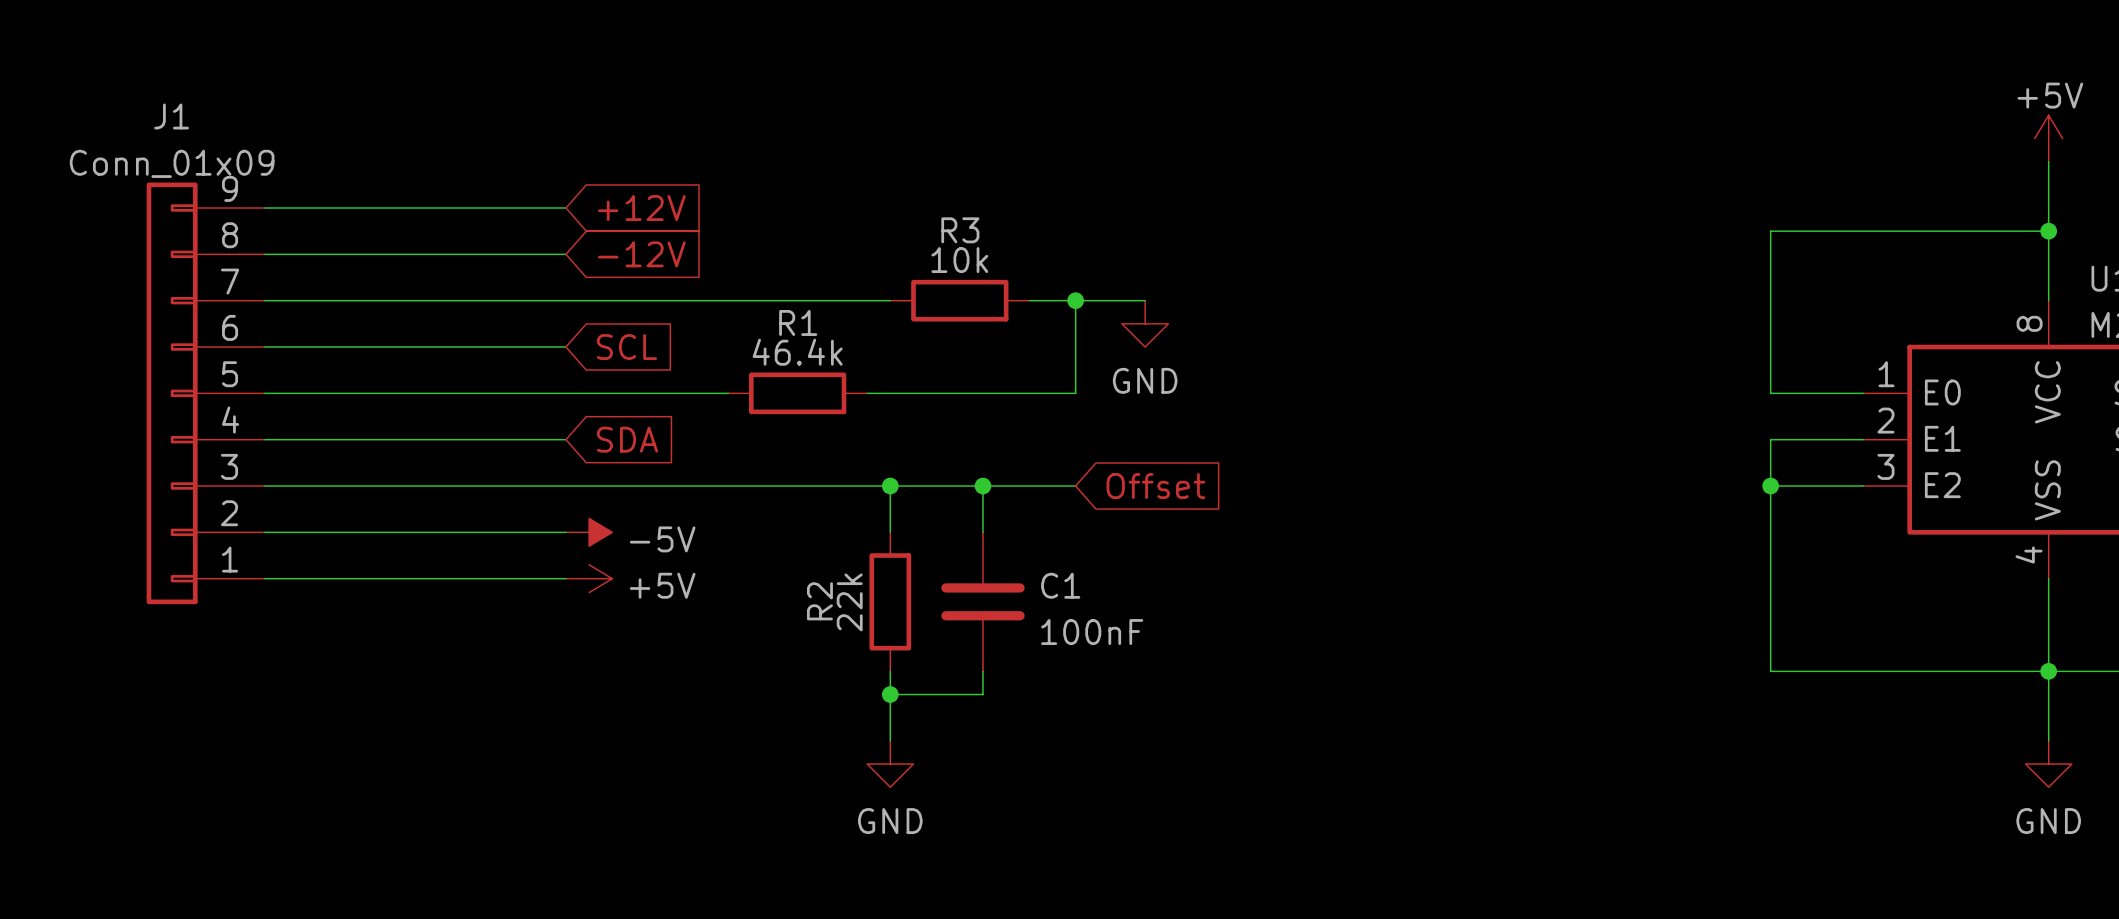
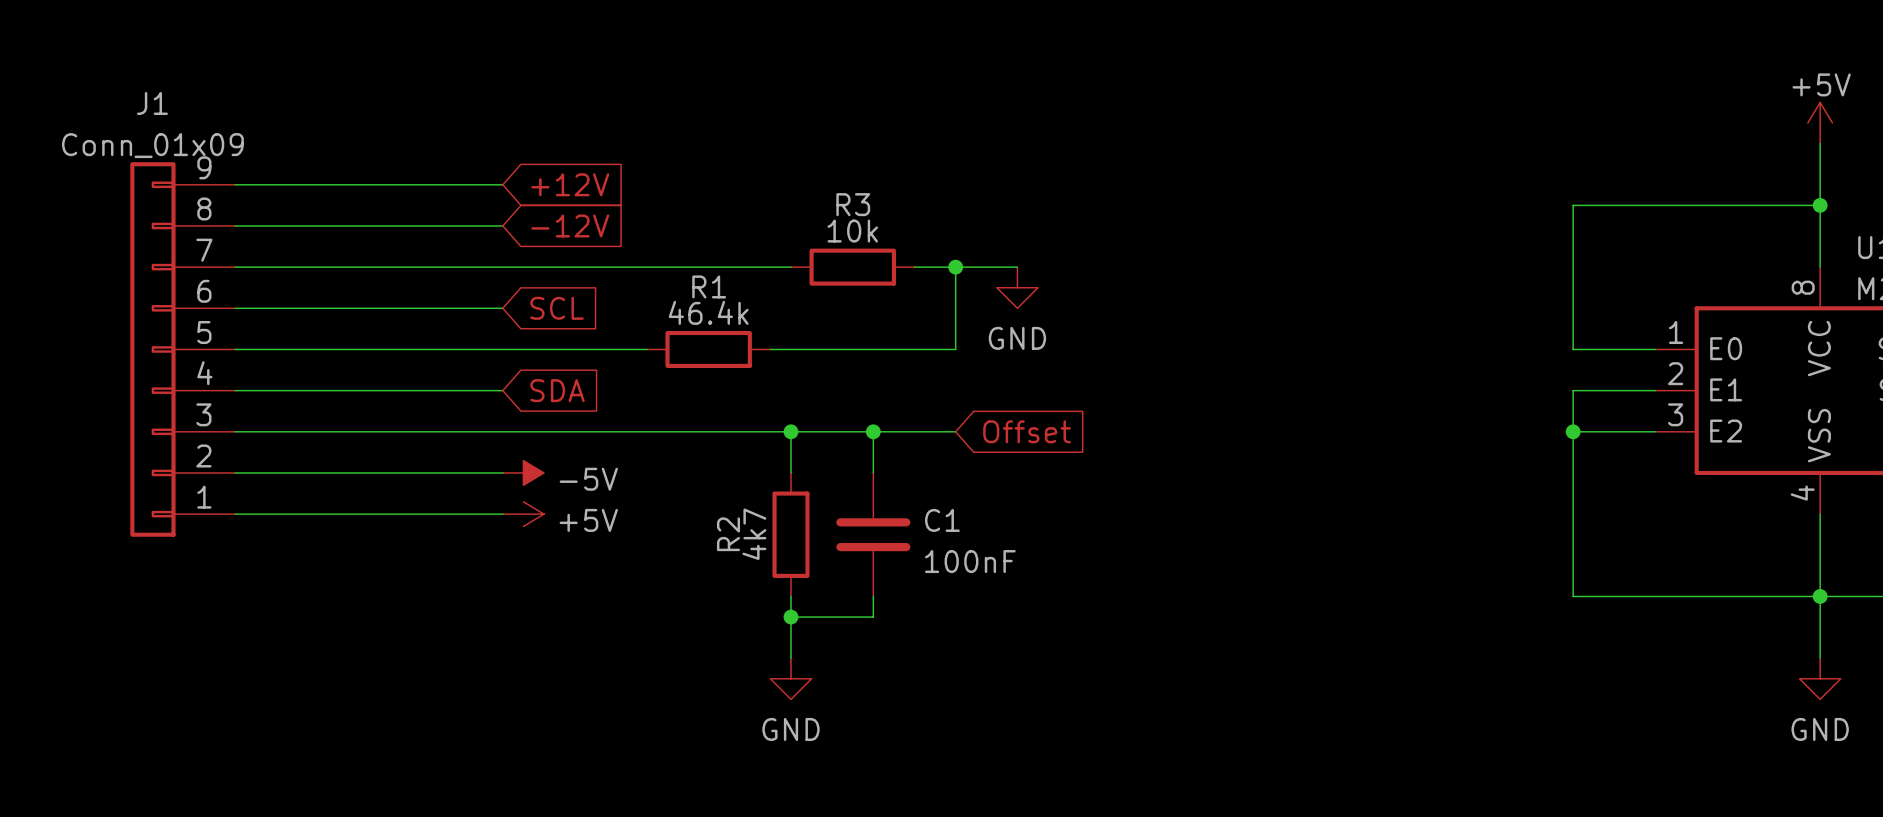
R2 value: 22k (849, 602) -> 4k7 (754, 534)

